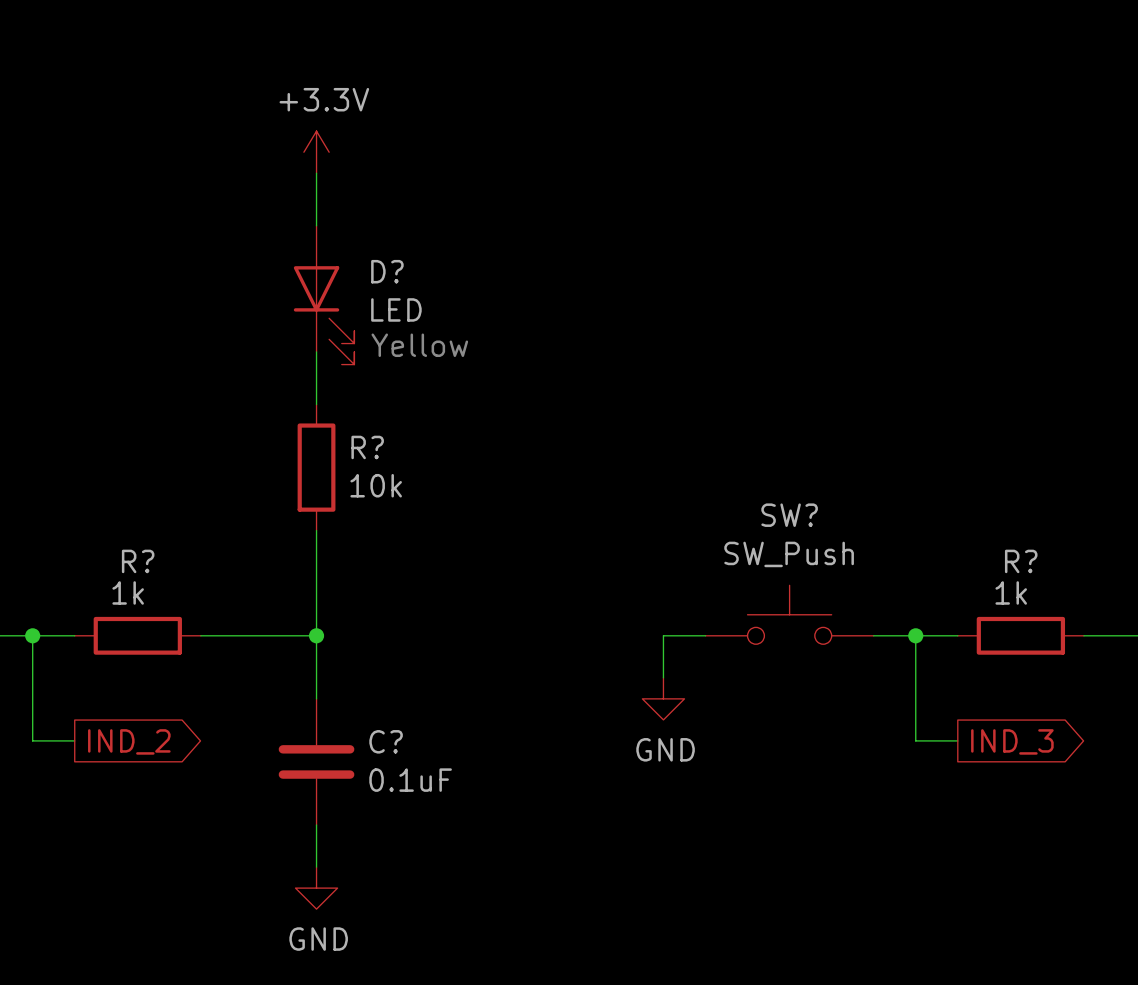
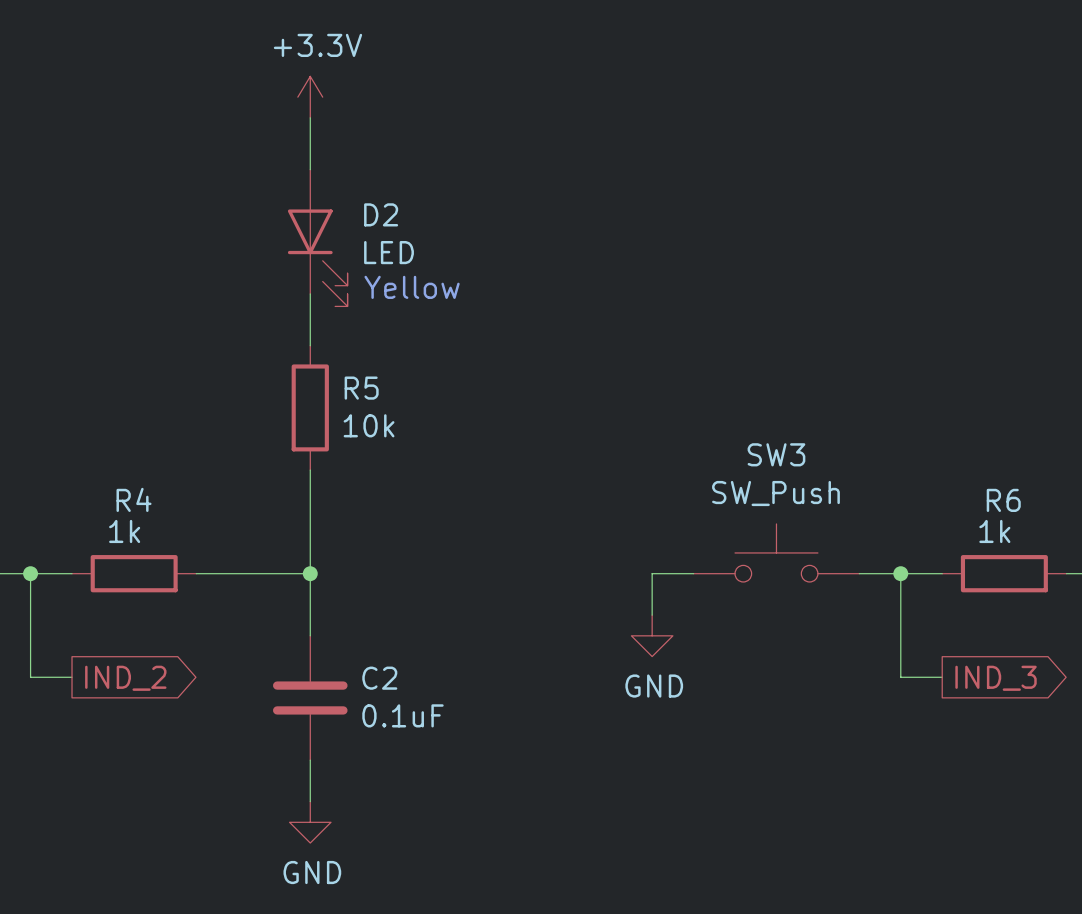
D? name: D? (387, 271) -> D2 (381, 214)
R? name: R? (367, 447) -> R5 (361, 388)
SW? name: SW? (789, 515) -> SW3 (776, 454)
R? name: R? (138, 561) -> R4 (134, 499)
R? name: R? (1021, 561) -> R6 (1003, 500)
C? name: C? (386, 741) -> C2 (379, 678)

